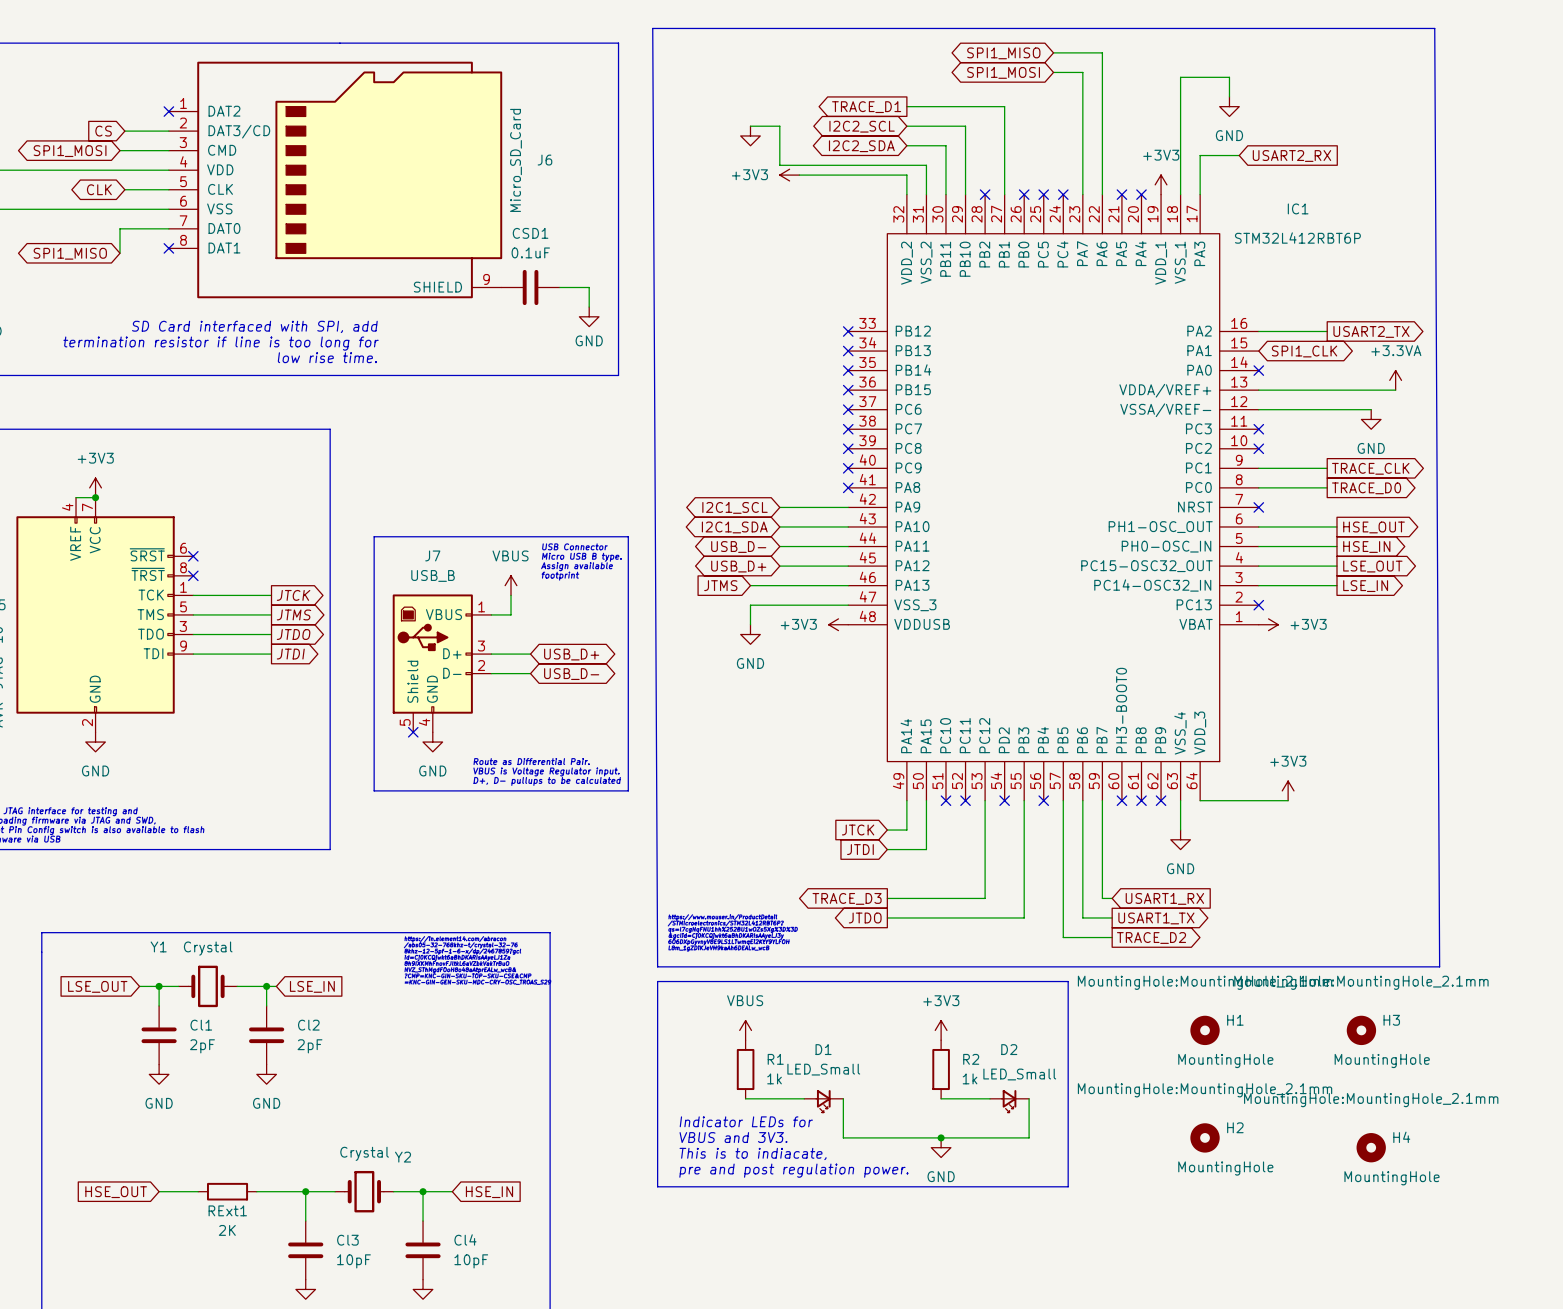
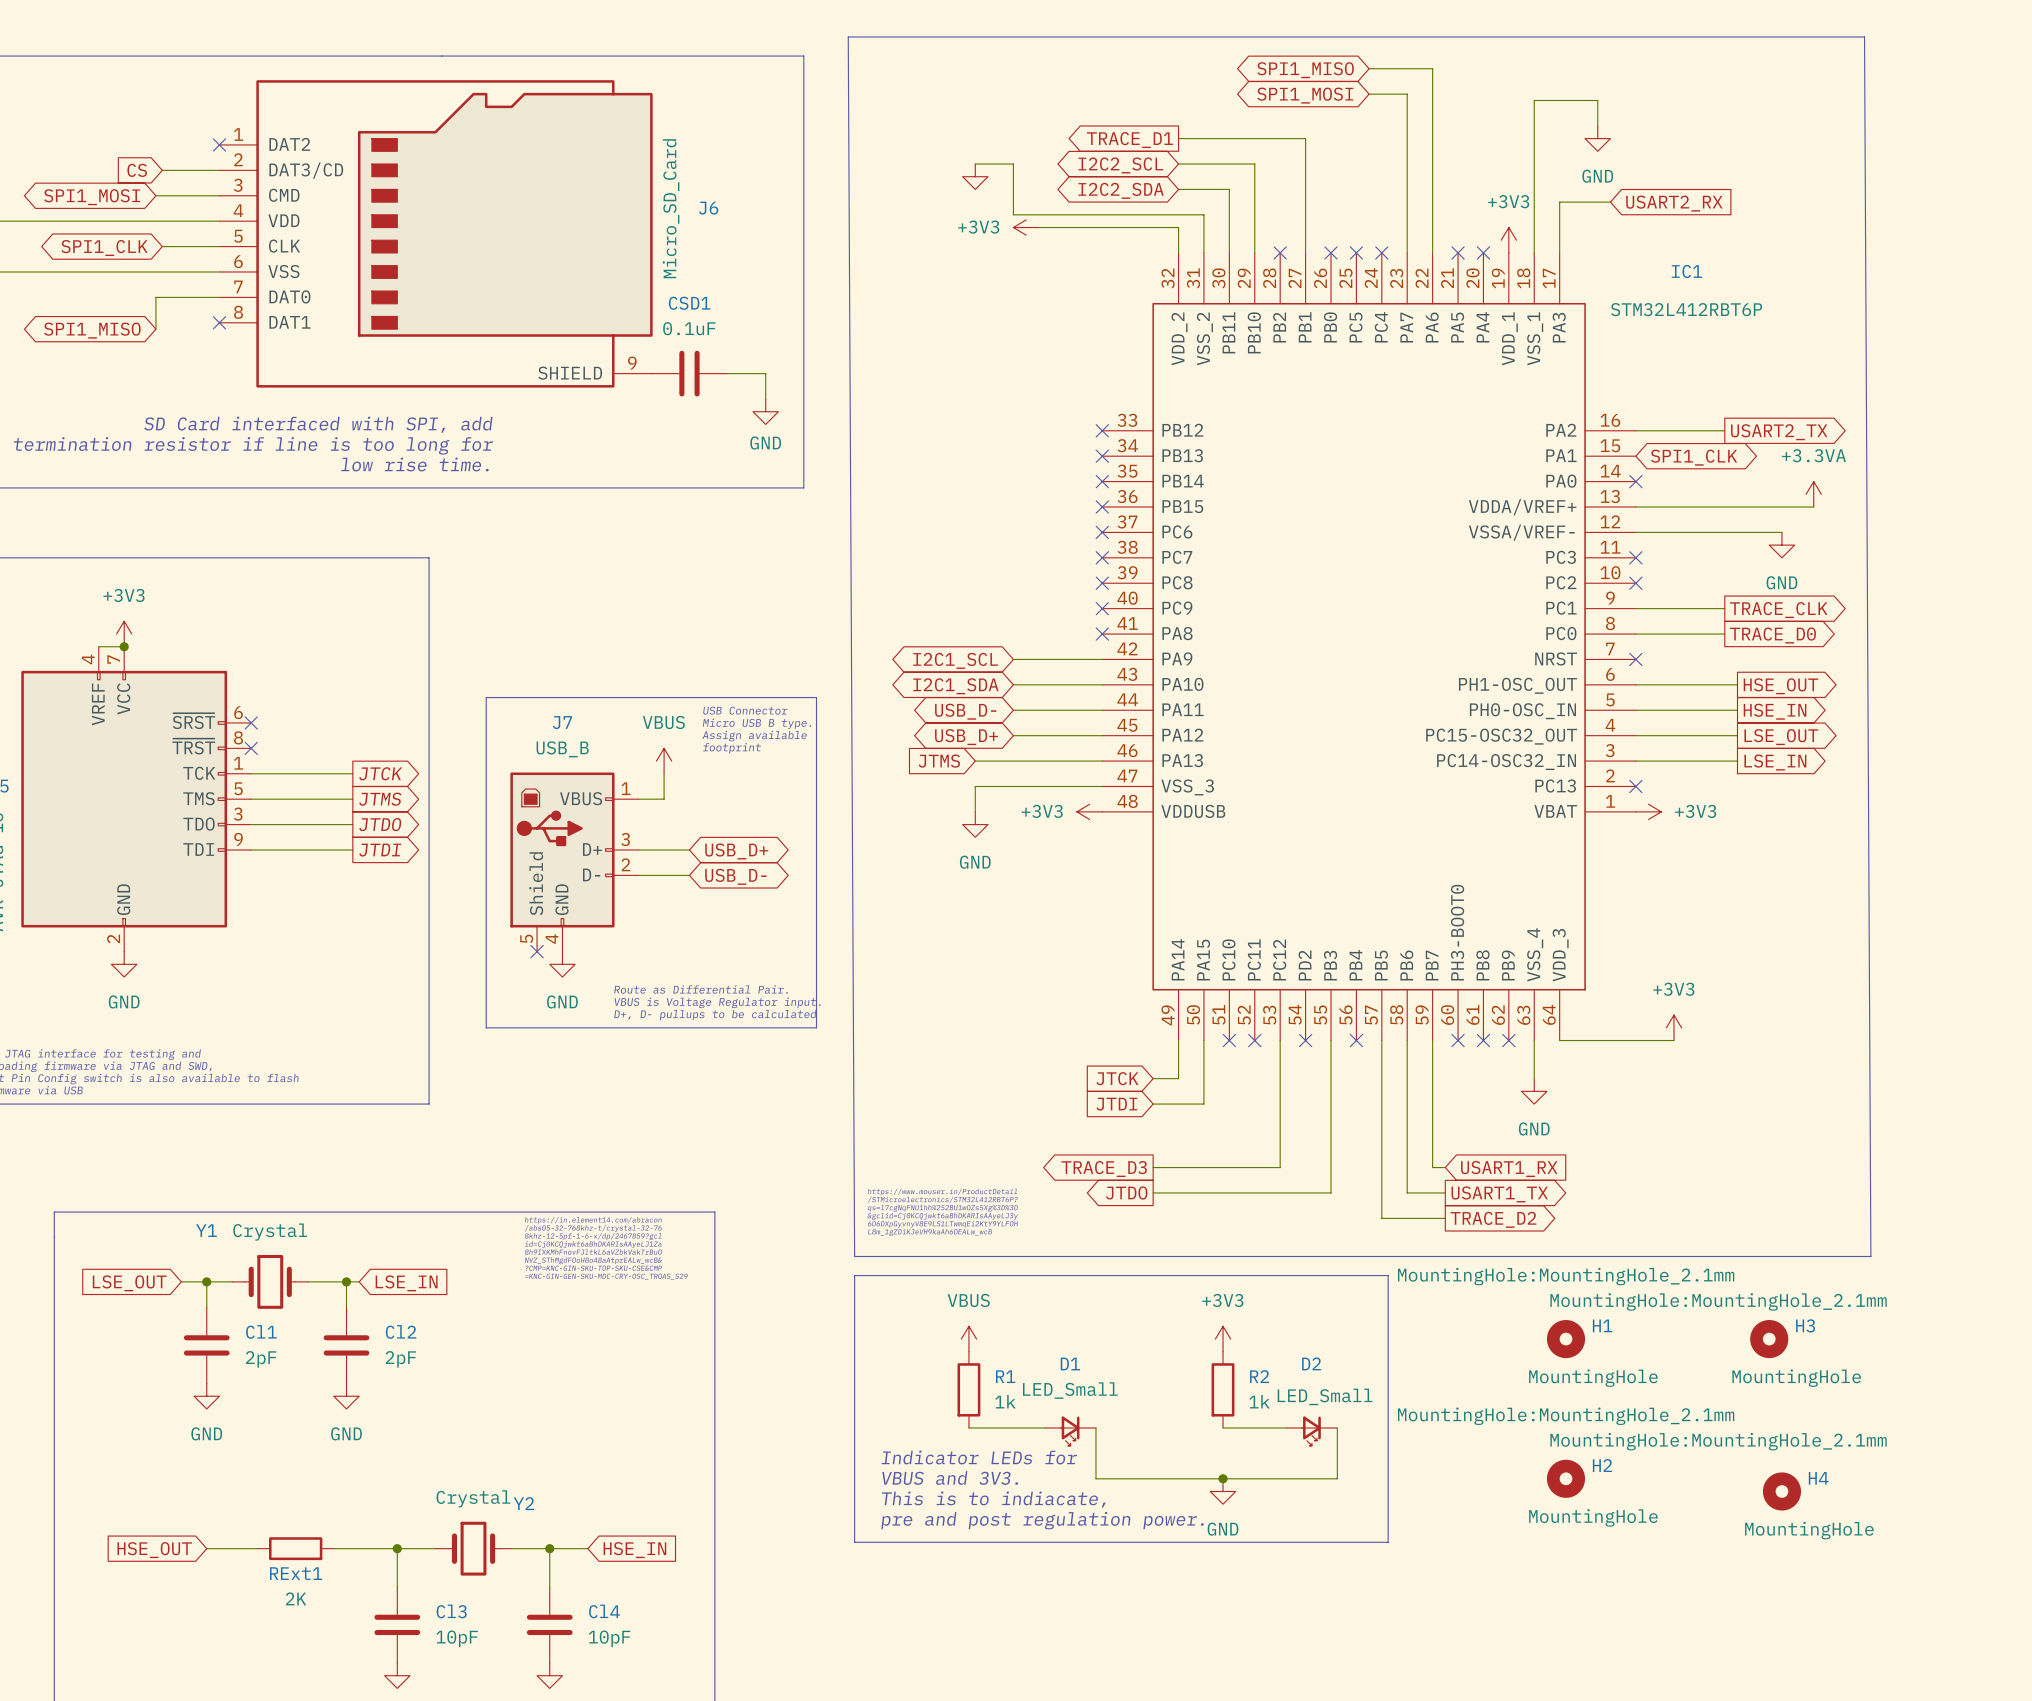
global label: CLK (99, 189) -> SPI1_CLK (104, 248)
H3 text position: MountingHole:MountingHole_2.1mm (1361, 982) -> MountingHole:MountingHole_2.1mm (1718, 1301)
H4 text position: MountingHole:MountingHole_2.1mm (1371, 1100) -> MountingHole:MountingHole_2.1mm (1718, 1441)

